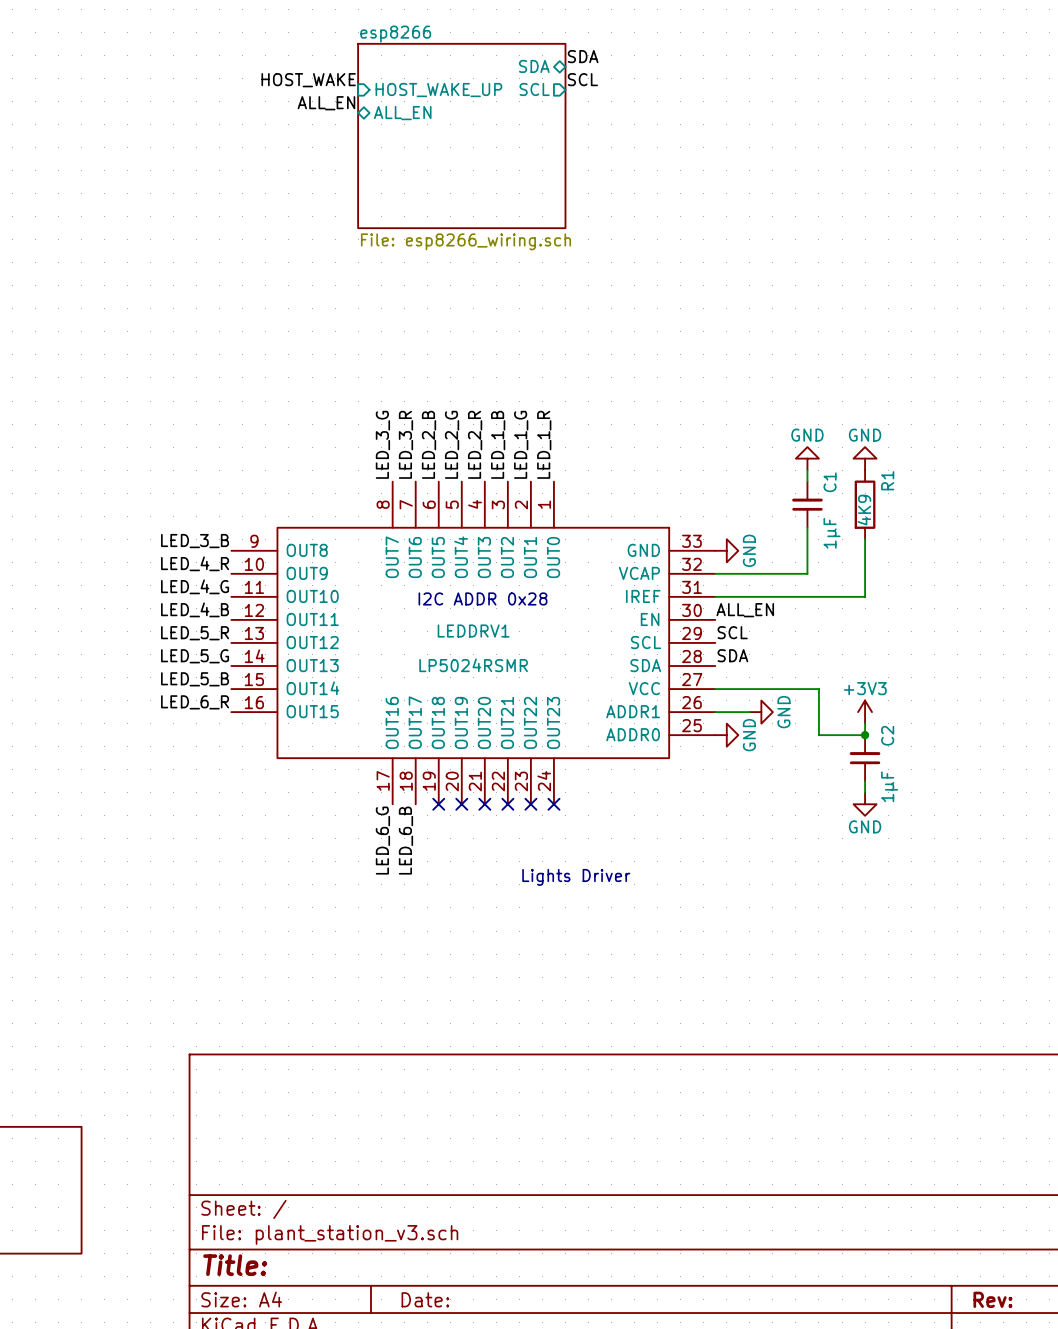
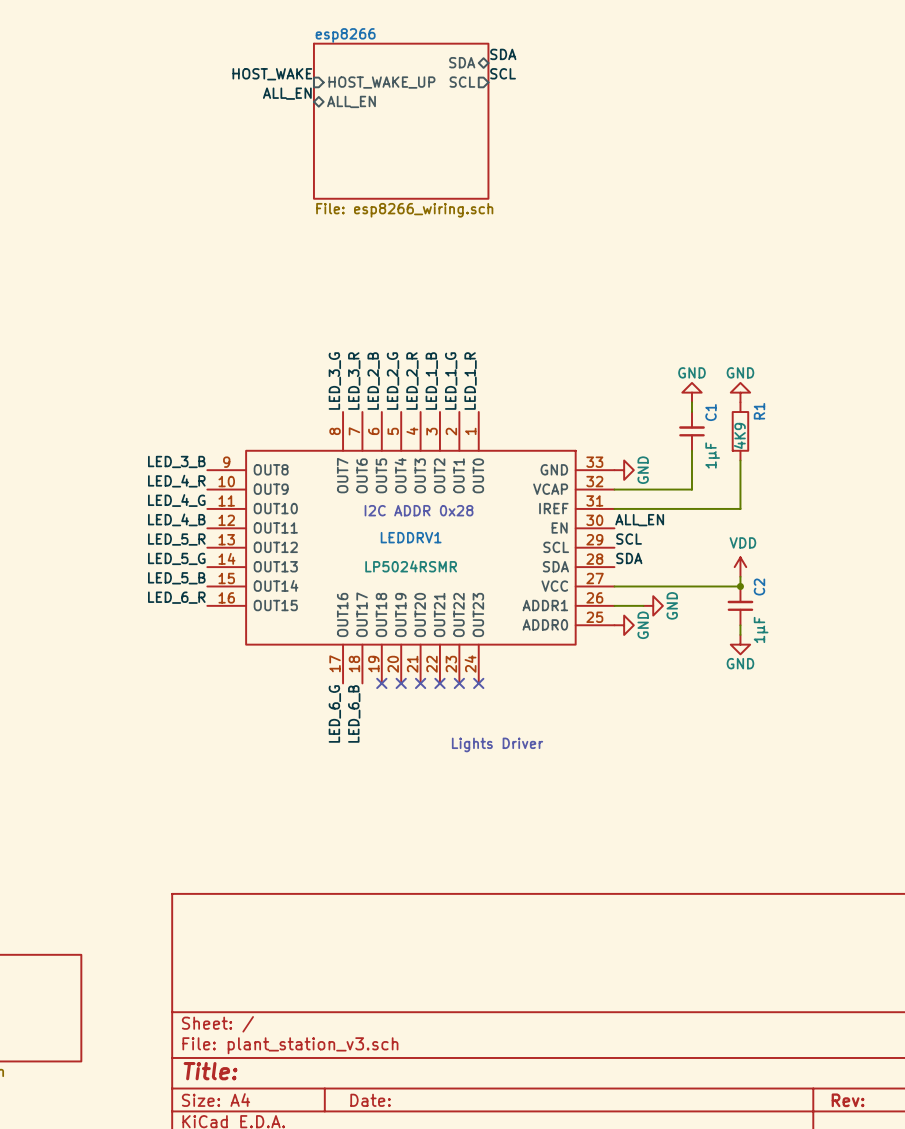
power symbol: none -> VDD (740, 567)
wire: (818, 689) (818, 735) (865, 735) (865, 723) -> (701, 586) (740, 586) (740, 576)
power symbol: +3V3 (865, 712) -> none
junction position: (865, 735) -> (740, 586)
C2 position: (865, 758) -> (740, 605)
power symbol position: GND (865, 804) -> GND (740, 644)

